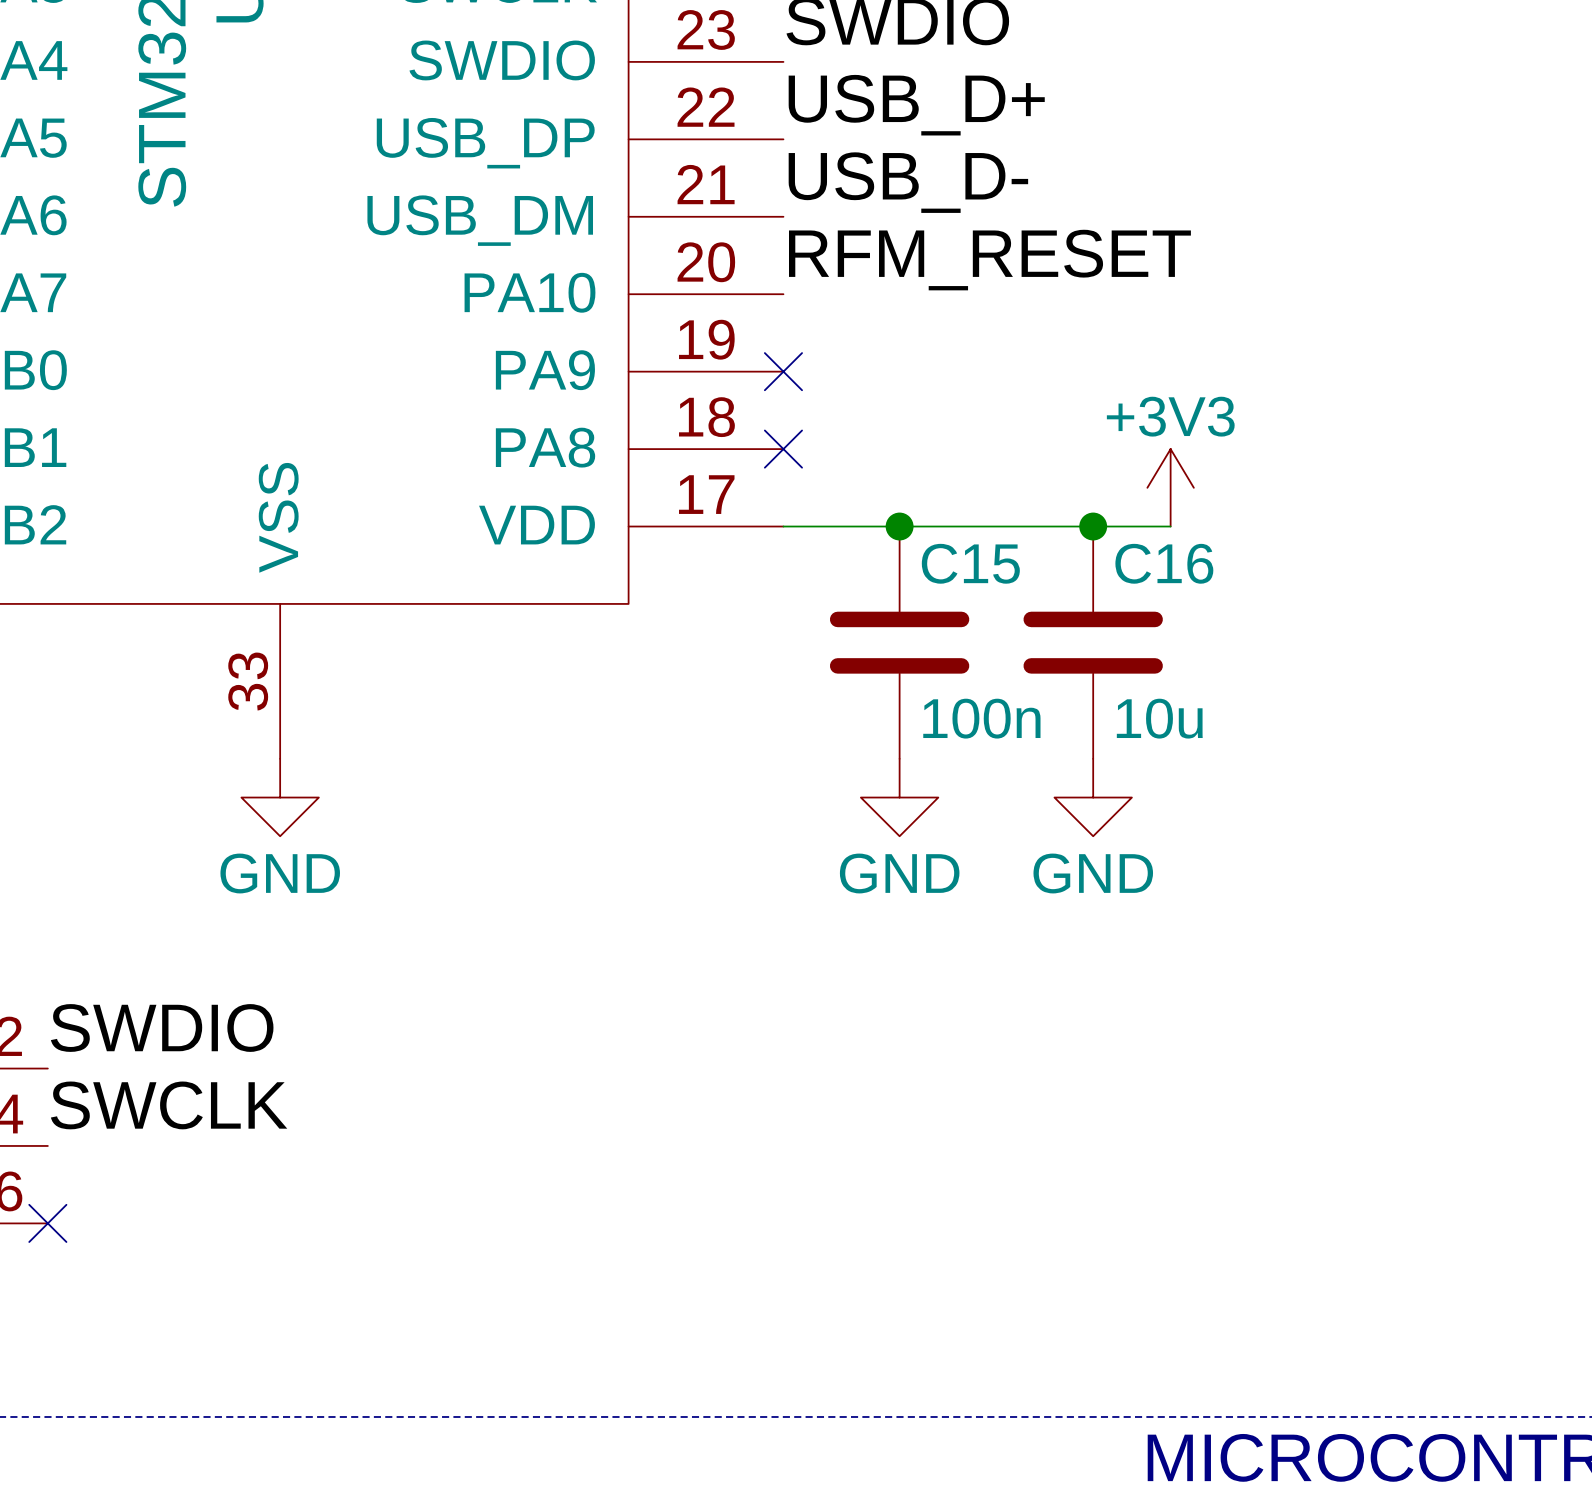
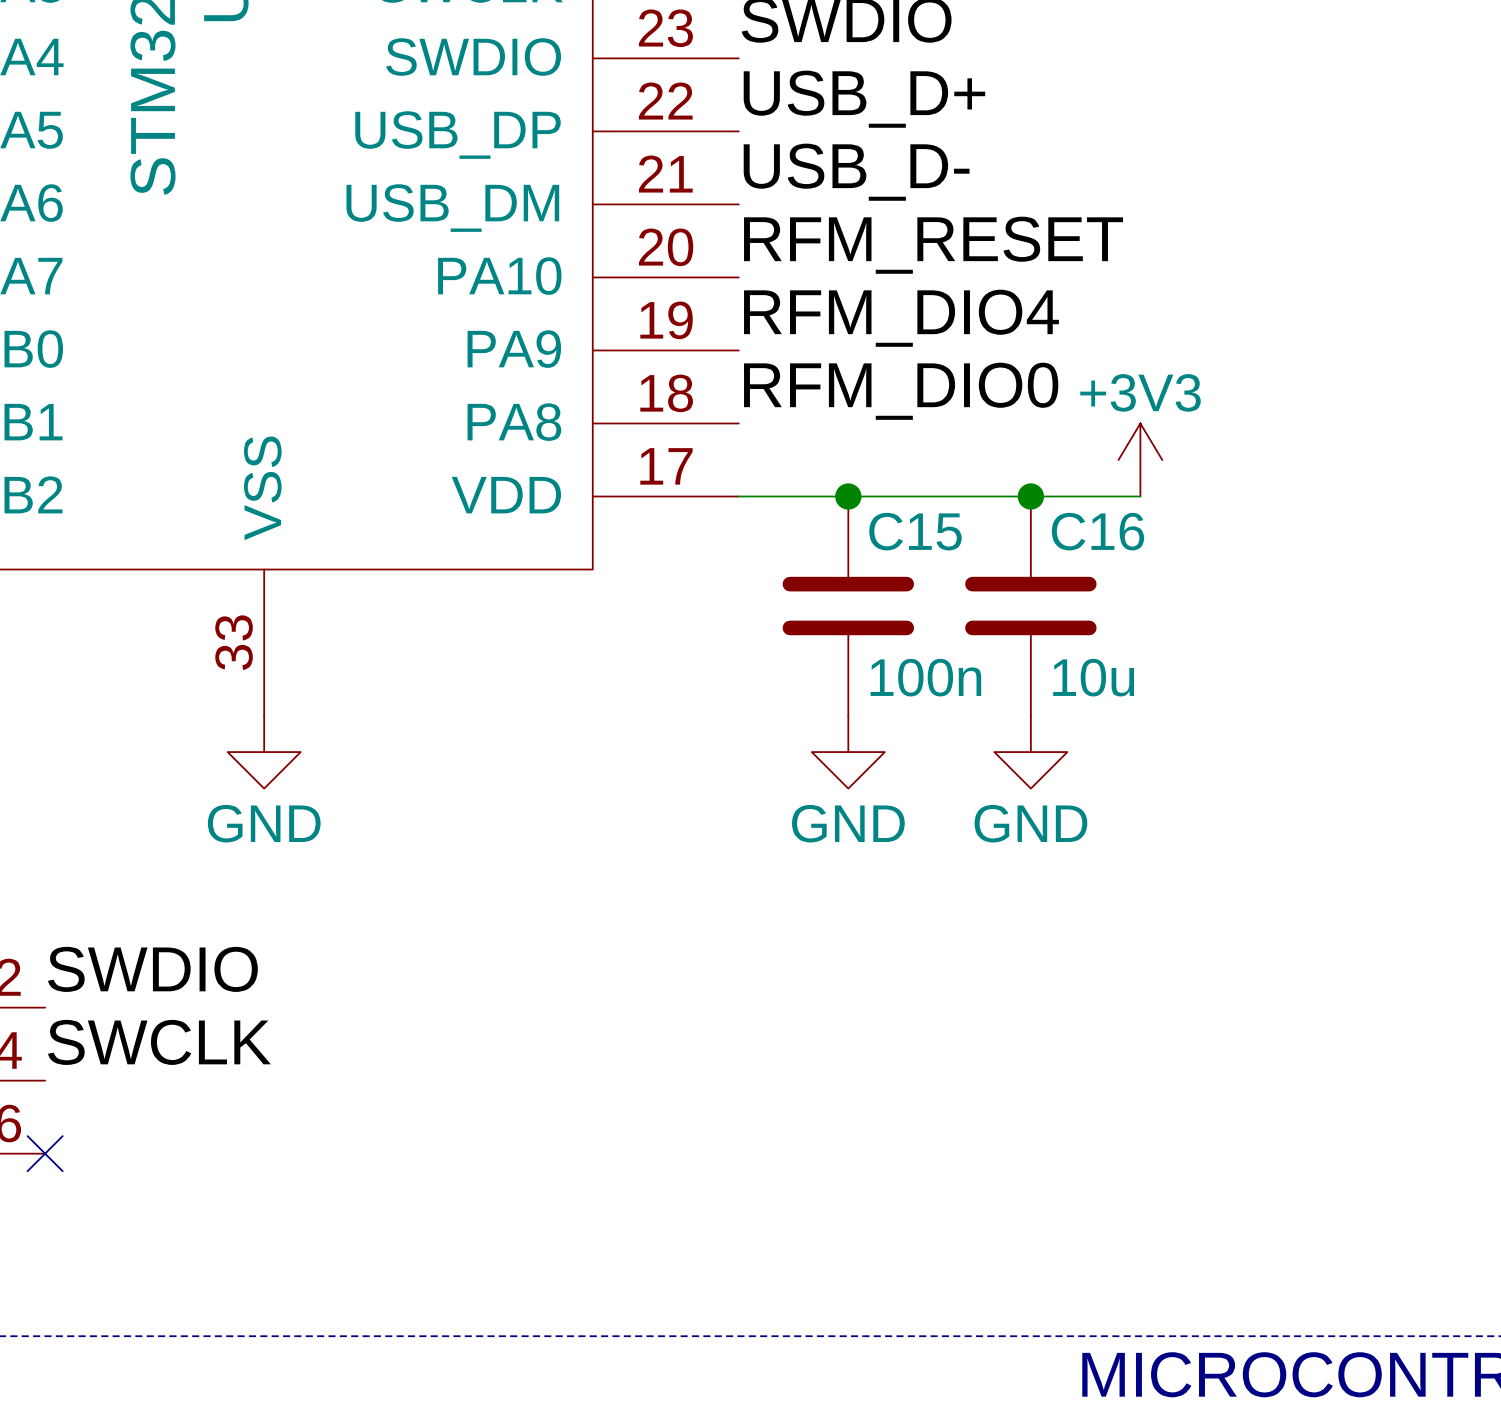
label: none -> RFM_DIO4 (901, 318)
no-connect mark: (783, 371) -> none
label: none -> RFM_DIO0 (901, 391)
no-connect mark: (783, 449) -> none
power symbol position: +3V3 (1170, 487) -> +3V3 (1140, 459)
wire: none -> (1103, 496) (1140, 496)

